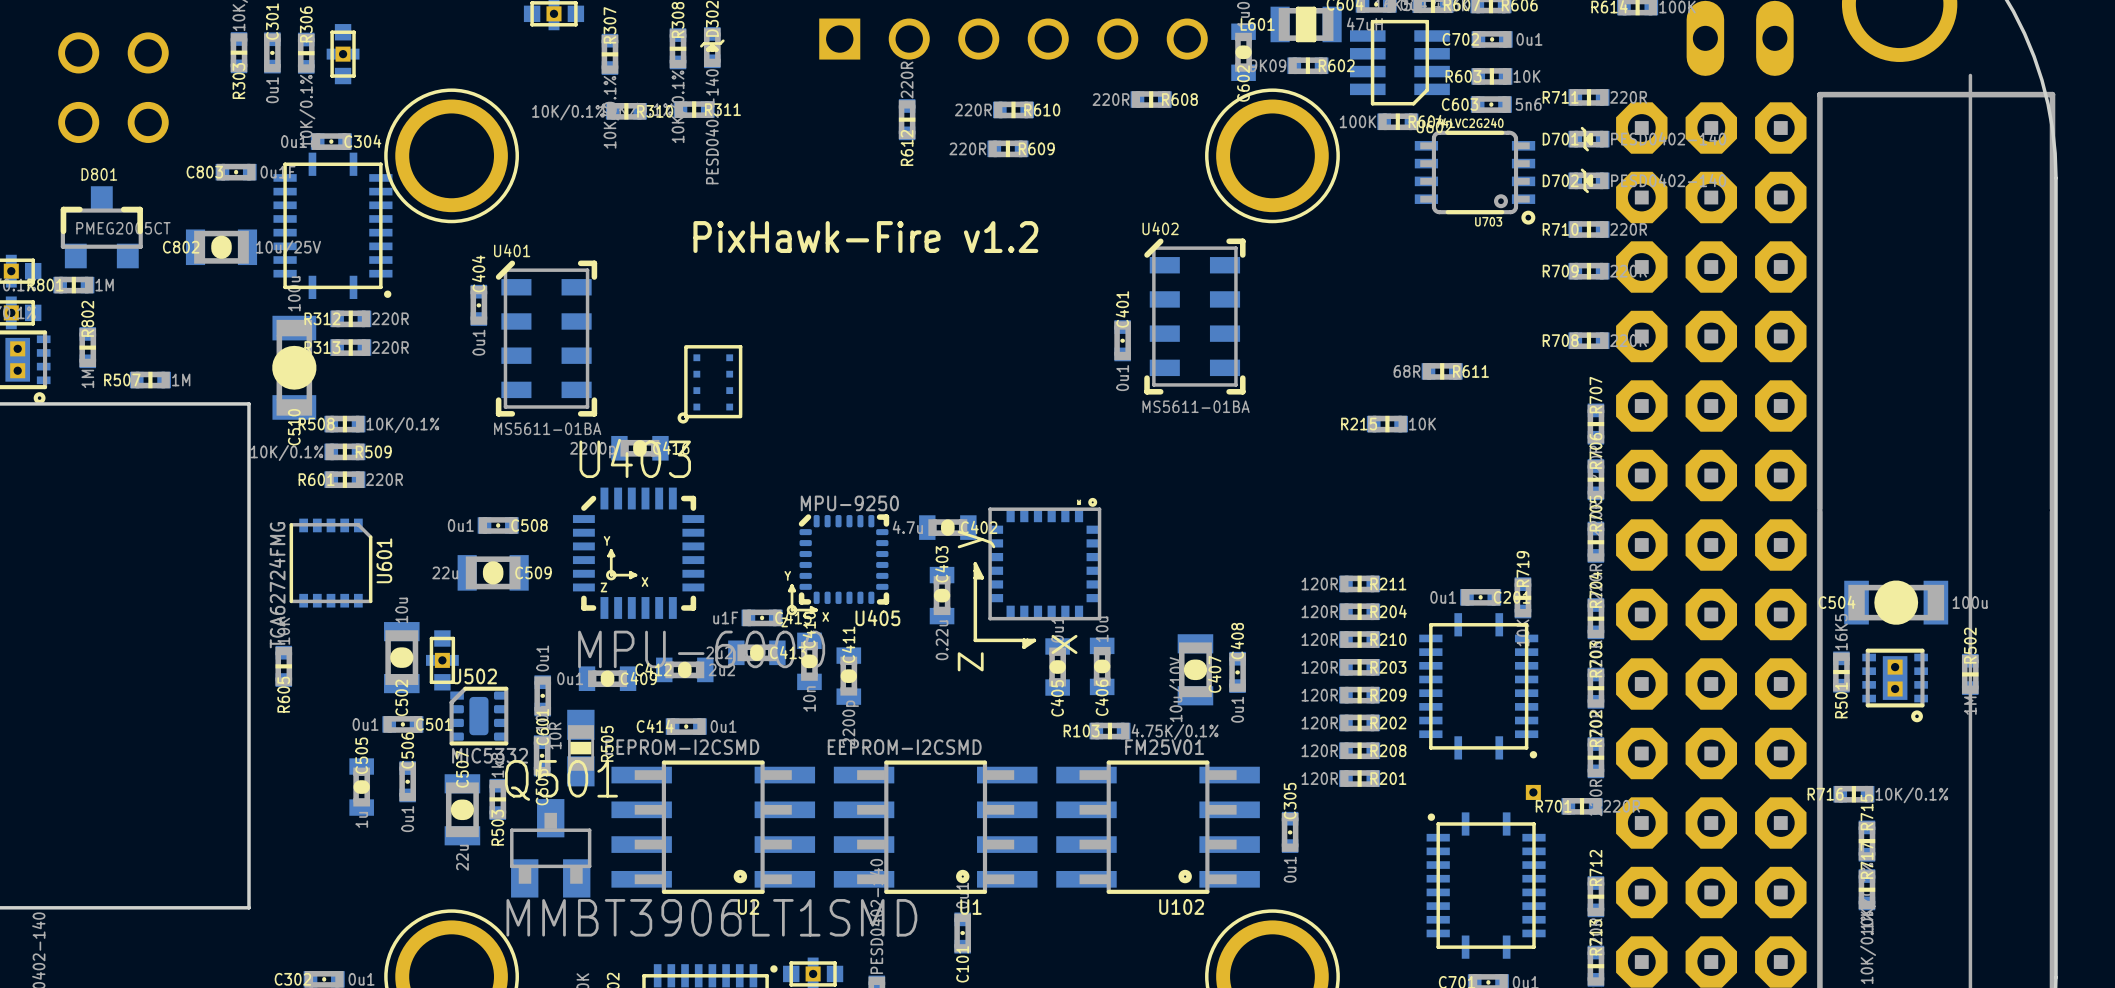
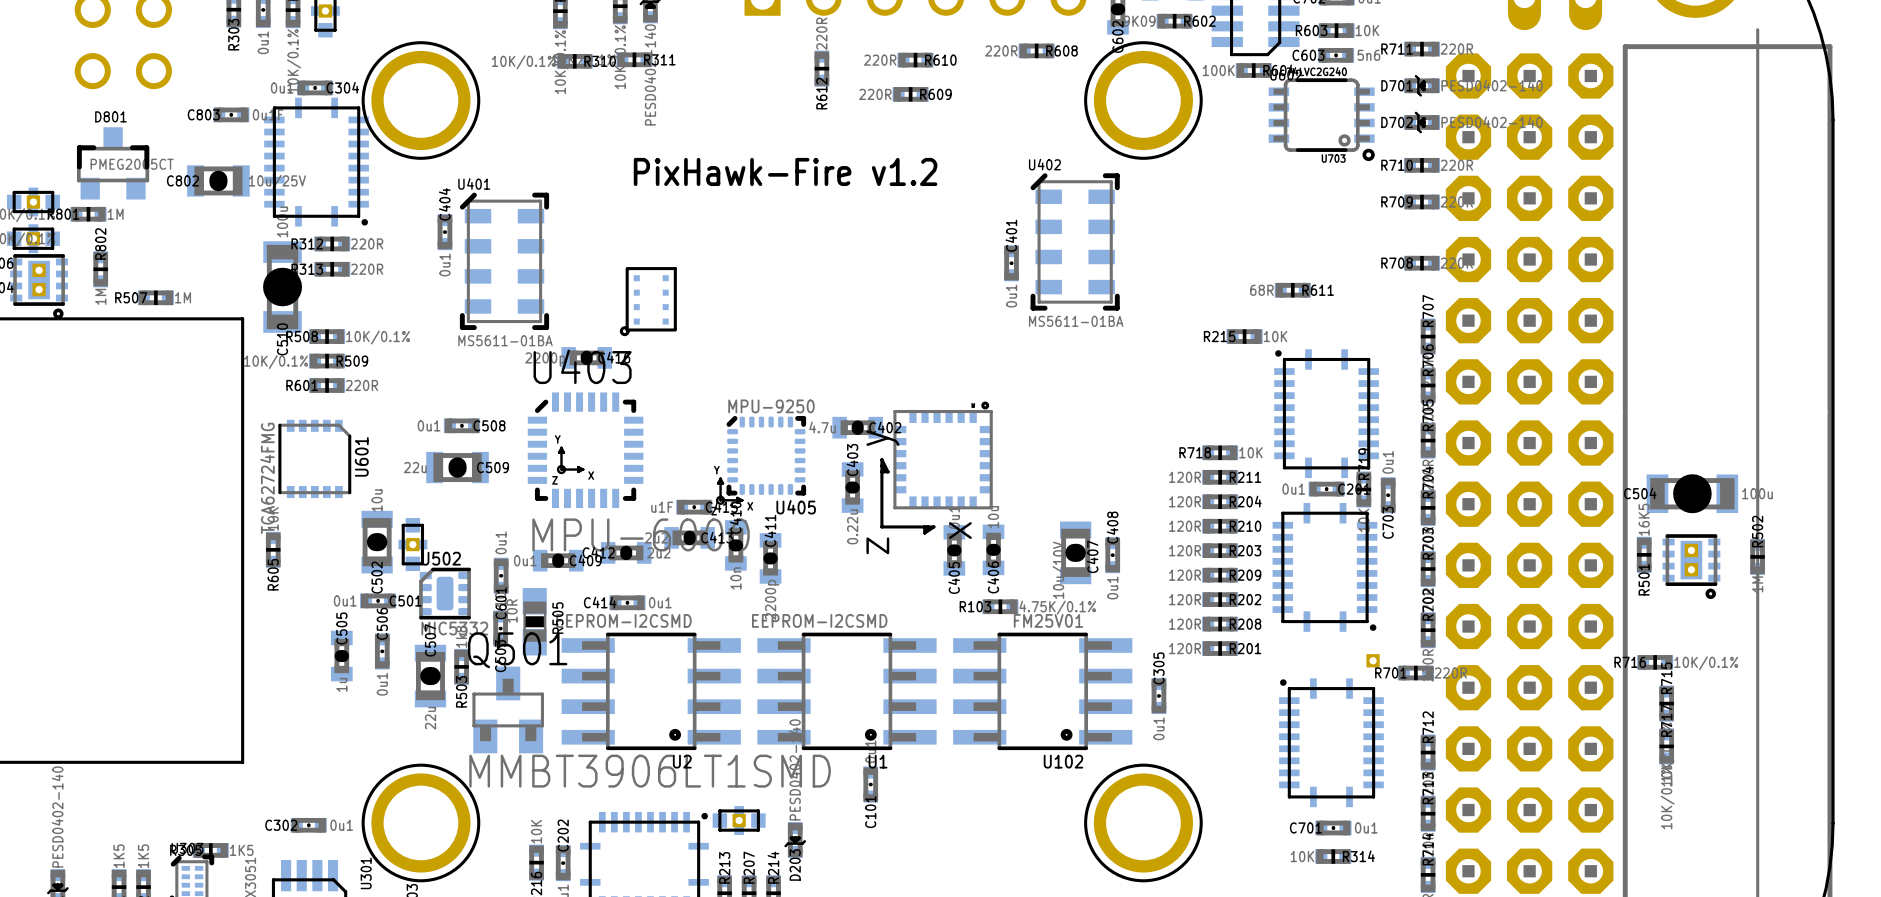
part: none -> (1326, 413)
R718: none -> 10K (1220, 452)
C703: none -> 0u1 (1388, 495)

